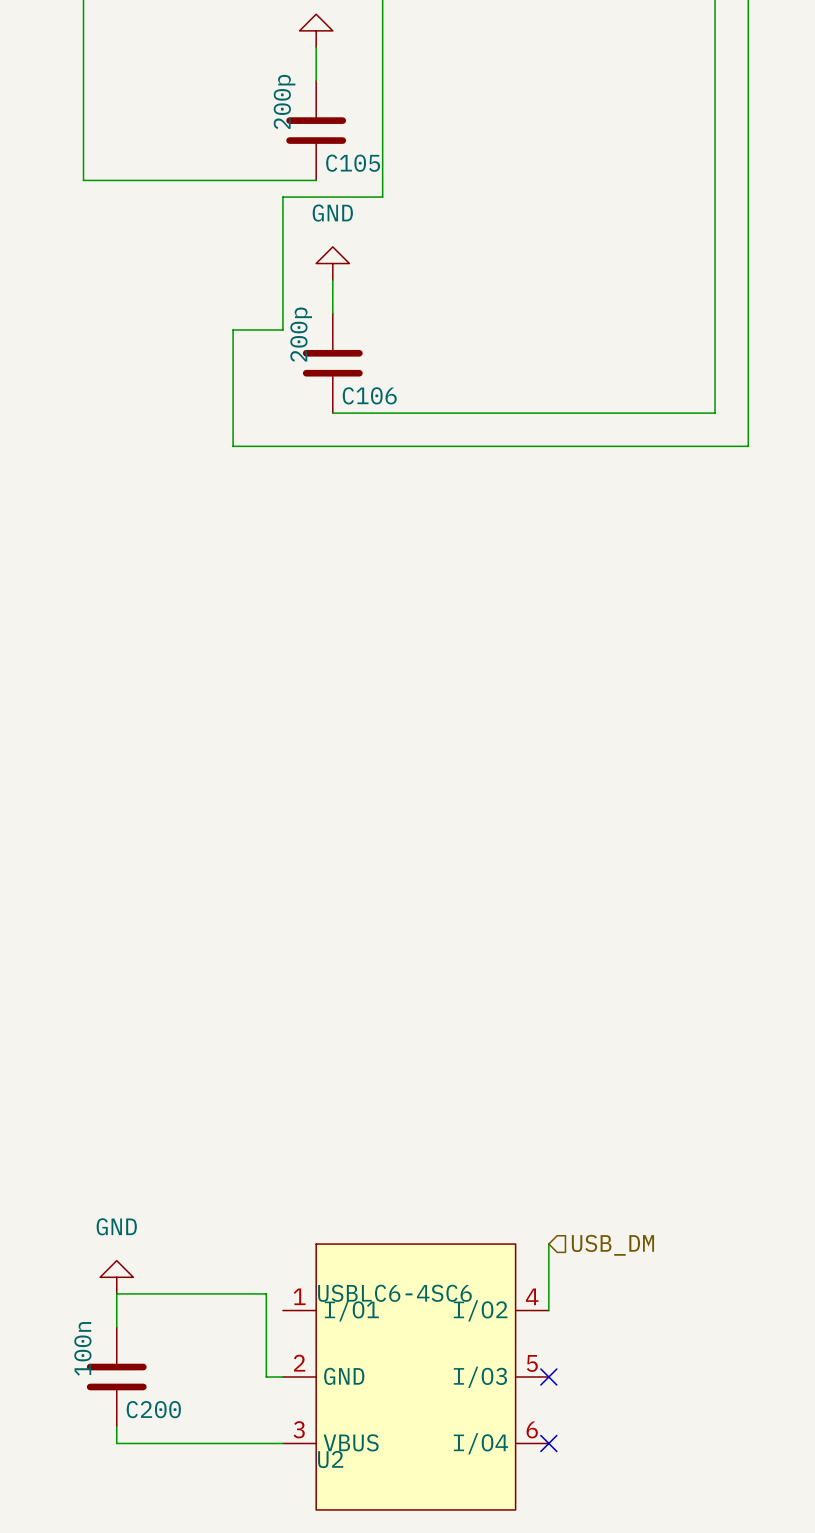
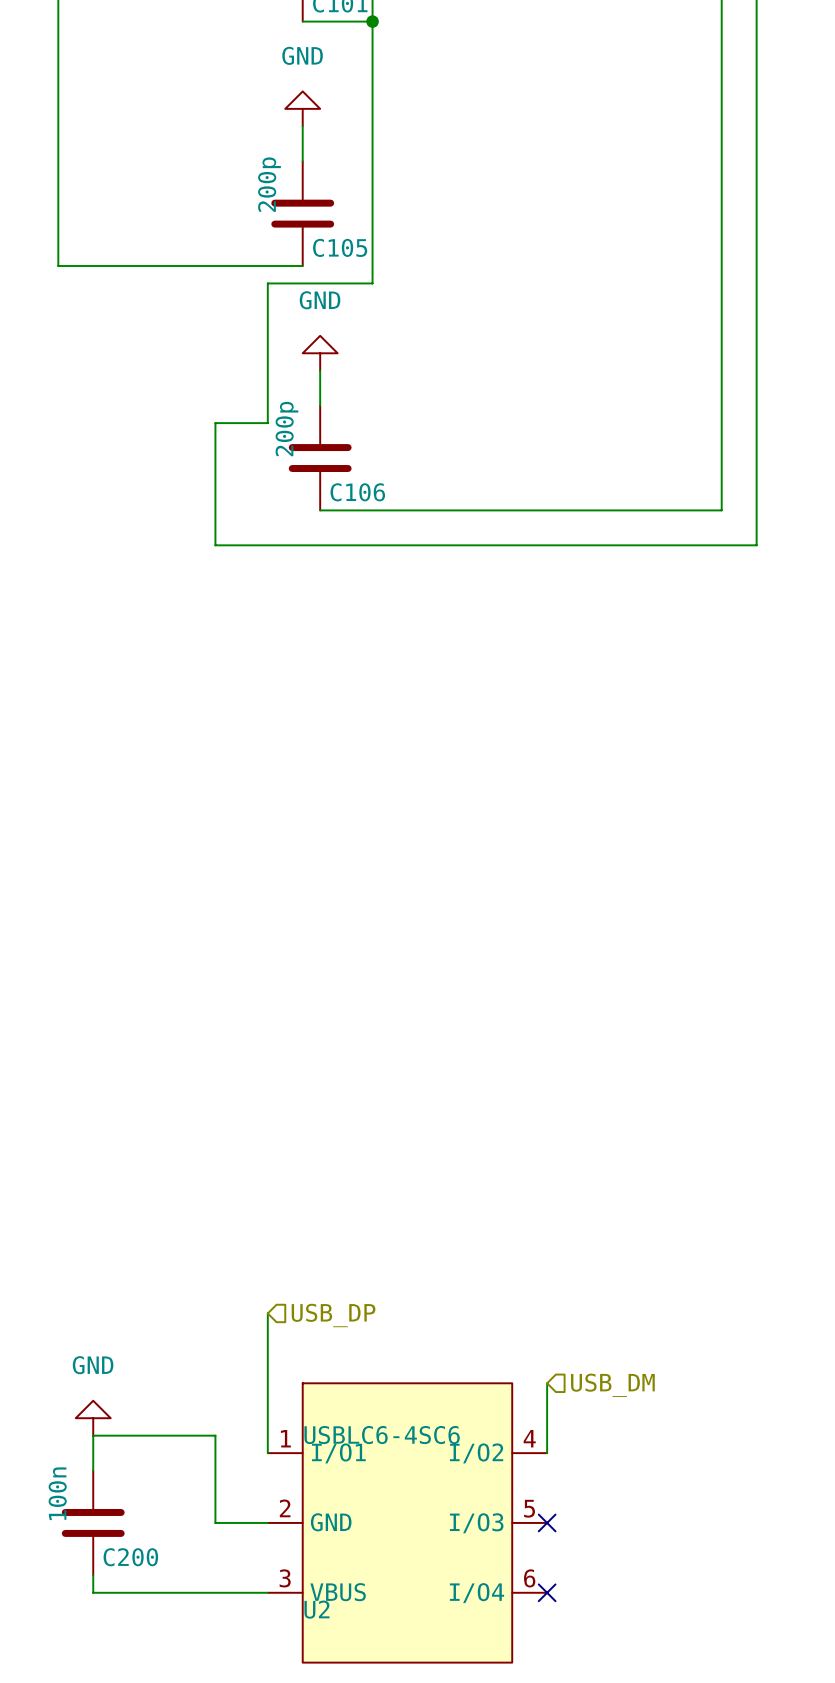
wire: none -> (267, 1313) (267, 1453)
hierarchical label: none -> USB_DP (333, 1315)
wire: (233, 1293) (266, 1293) (266, 1377) -> (215, 1435) (215, 1522) (250, 1522)

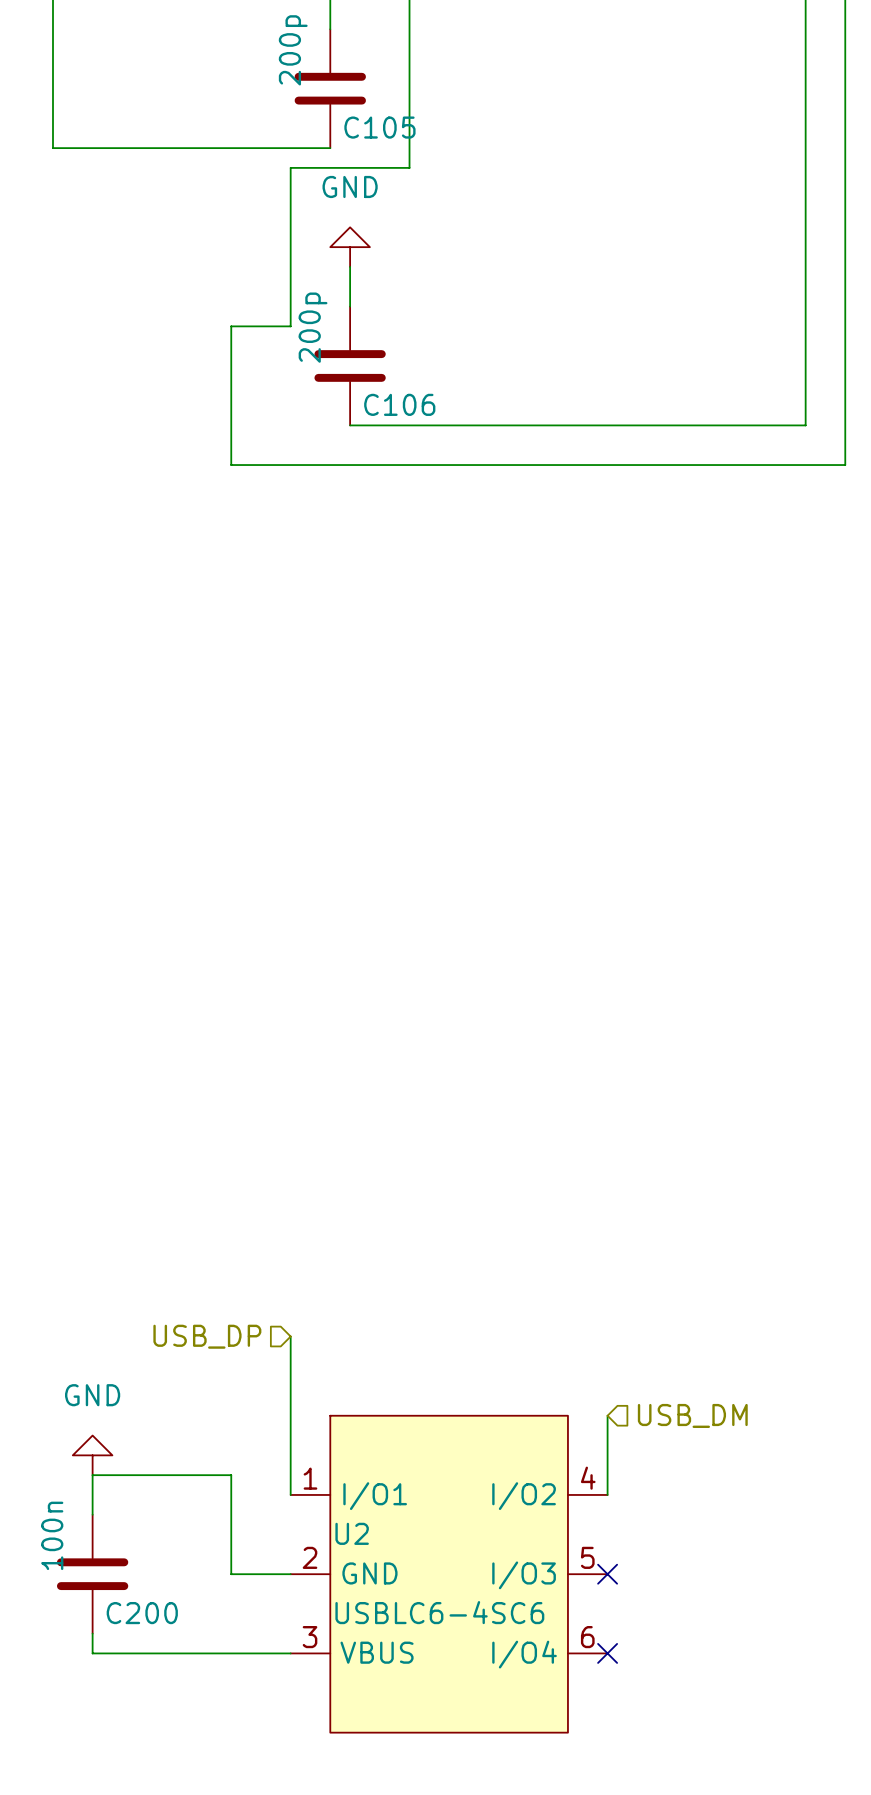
hierarchical label rotation: 0° (333, 1315) -> 180° (207, 1336)
hierarchical label position: USB_DP (333, 1315) -> USB_DP (207, 1336)
U2 value position: USBLC6-4SC6 (382, 1435) -> USBLC6-4SC6 (439, 1612)
U2 name position: U2 (316, 1609) -> U2 (352, 1533)

